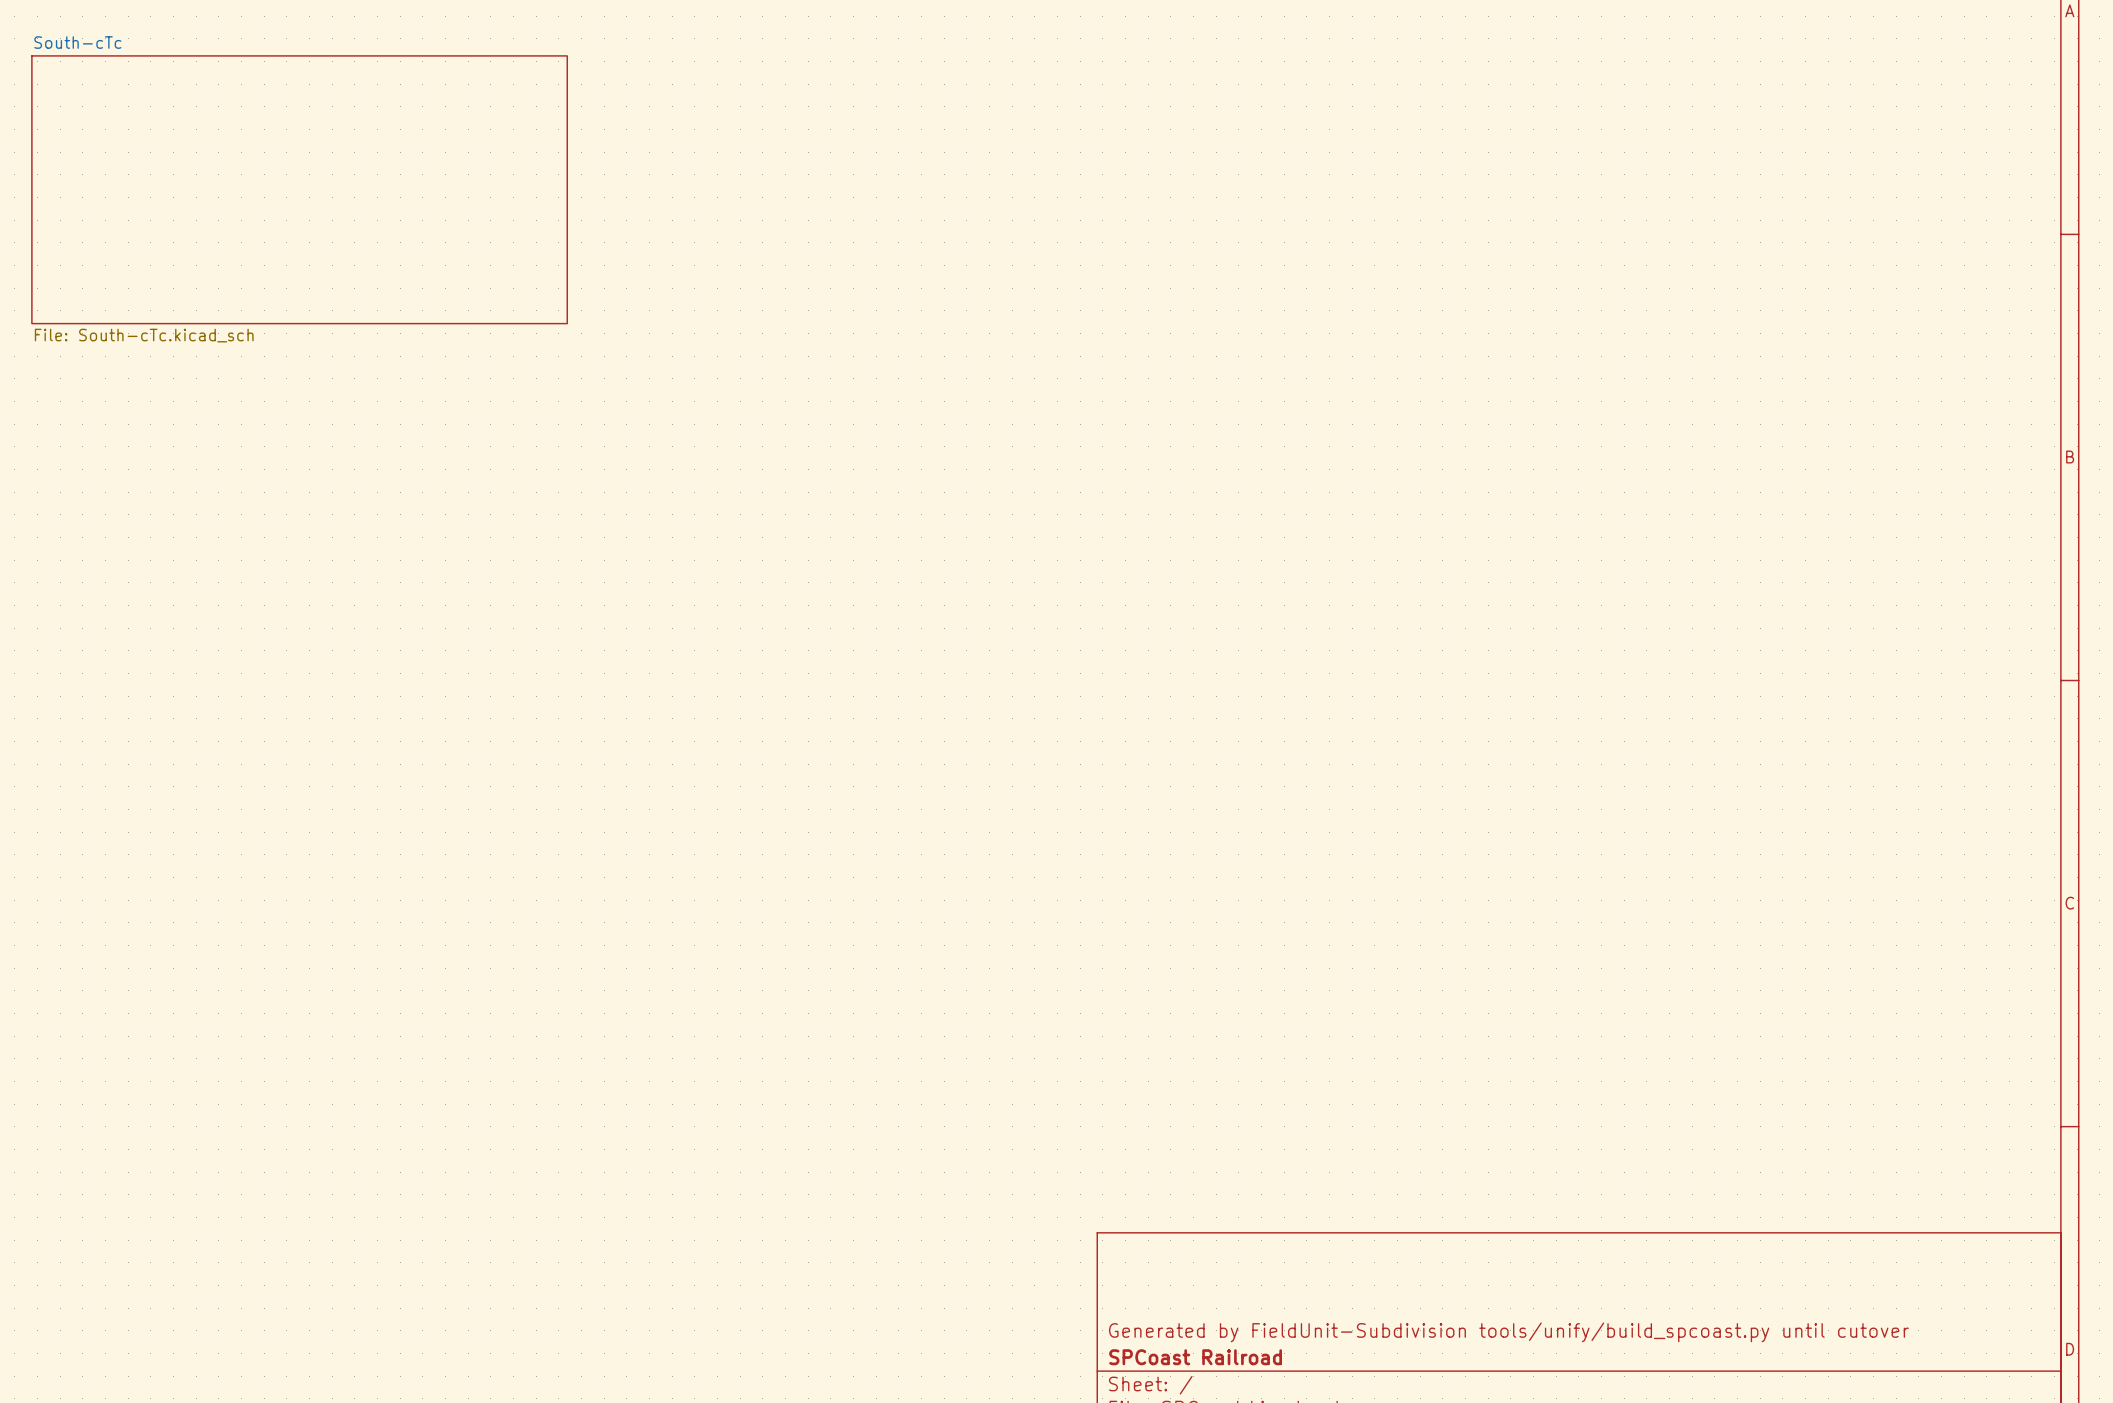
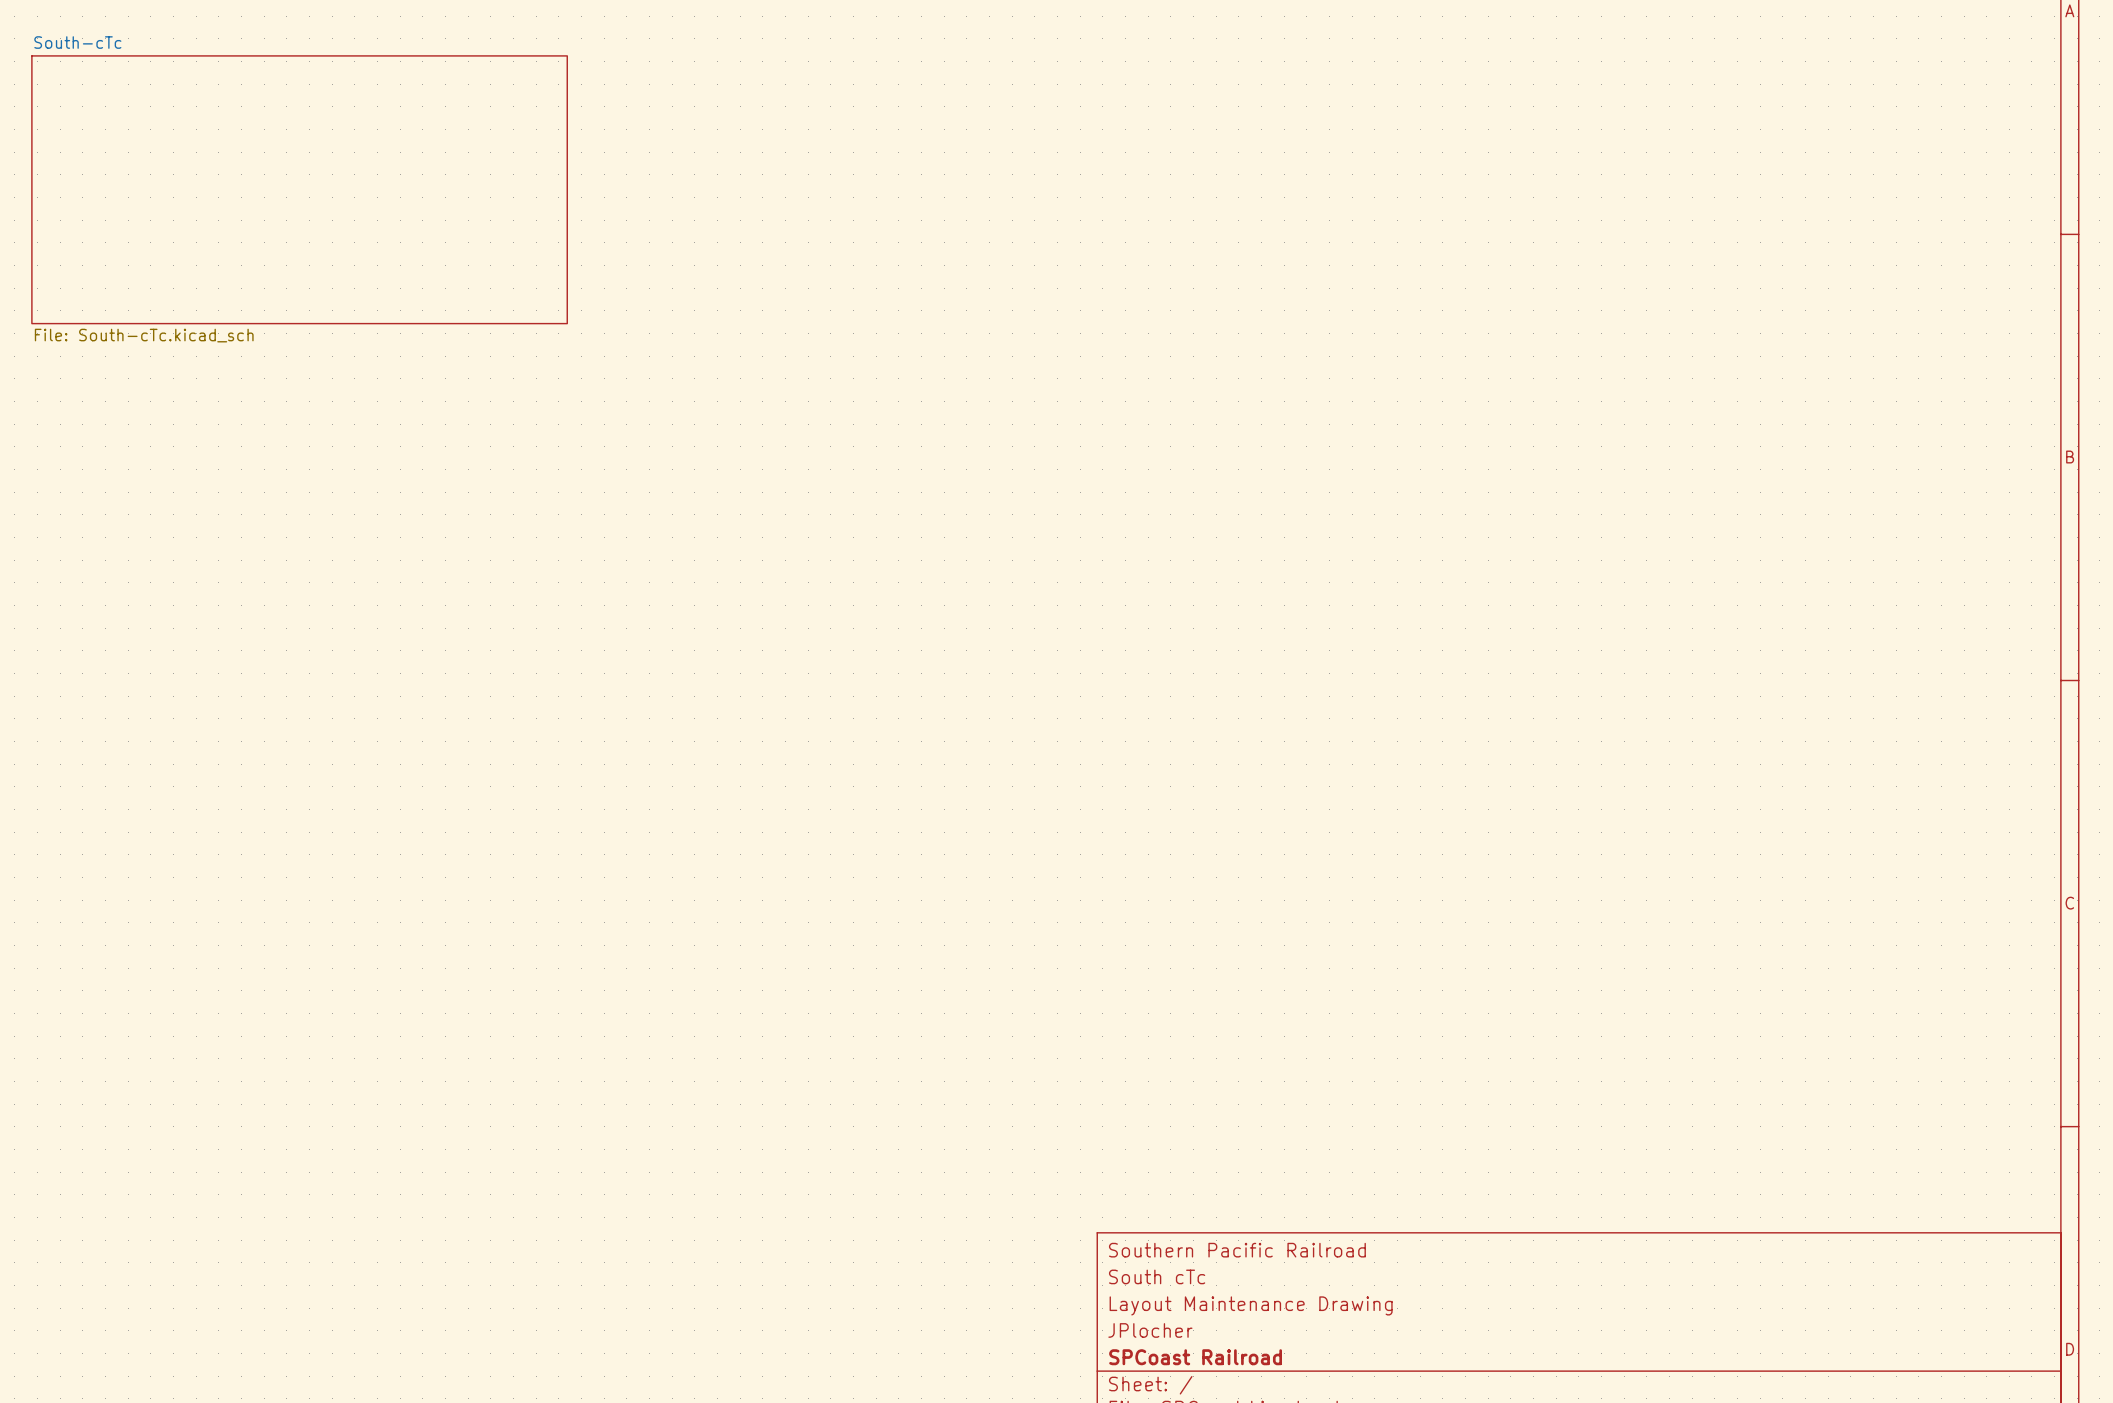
title block: none -> Southern Pacific Railroad (1237, 1250)
title block: none -> South cTc (1157, 1276)
title block: none -> Layout Maintenance Drawing (1251, 1305)
title block: Generated by FieldUnit-Subdivision tools/unify/build_spcoast.py until cutover (1508, 1332) -> JPlocher (1150, 1330)

